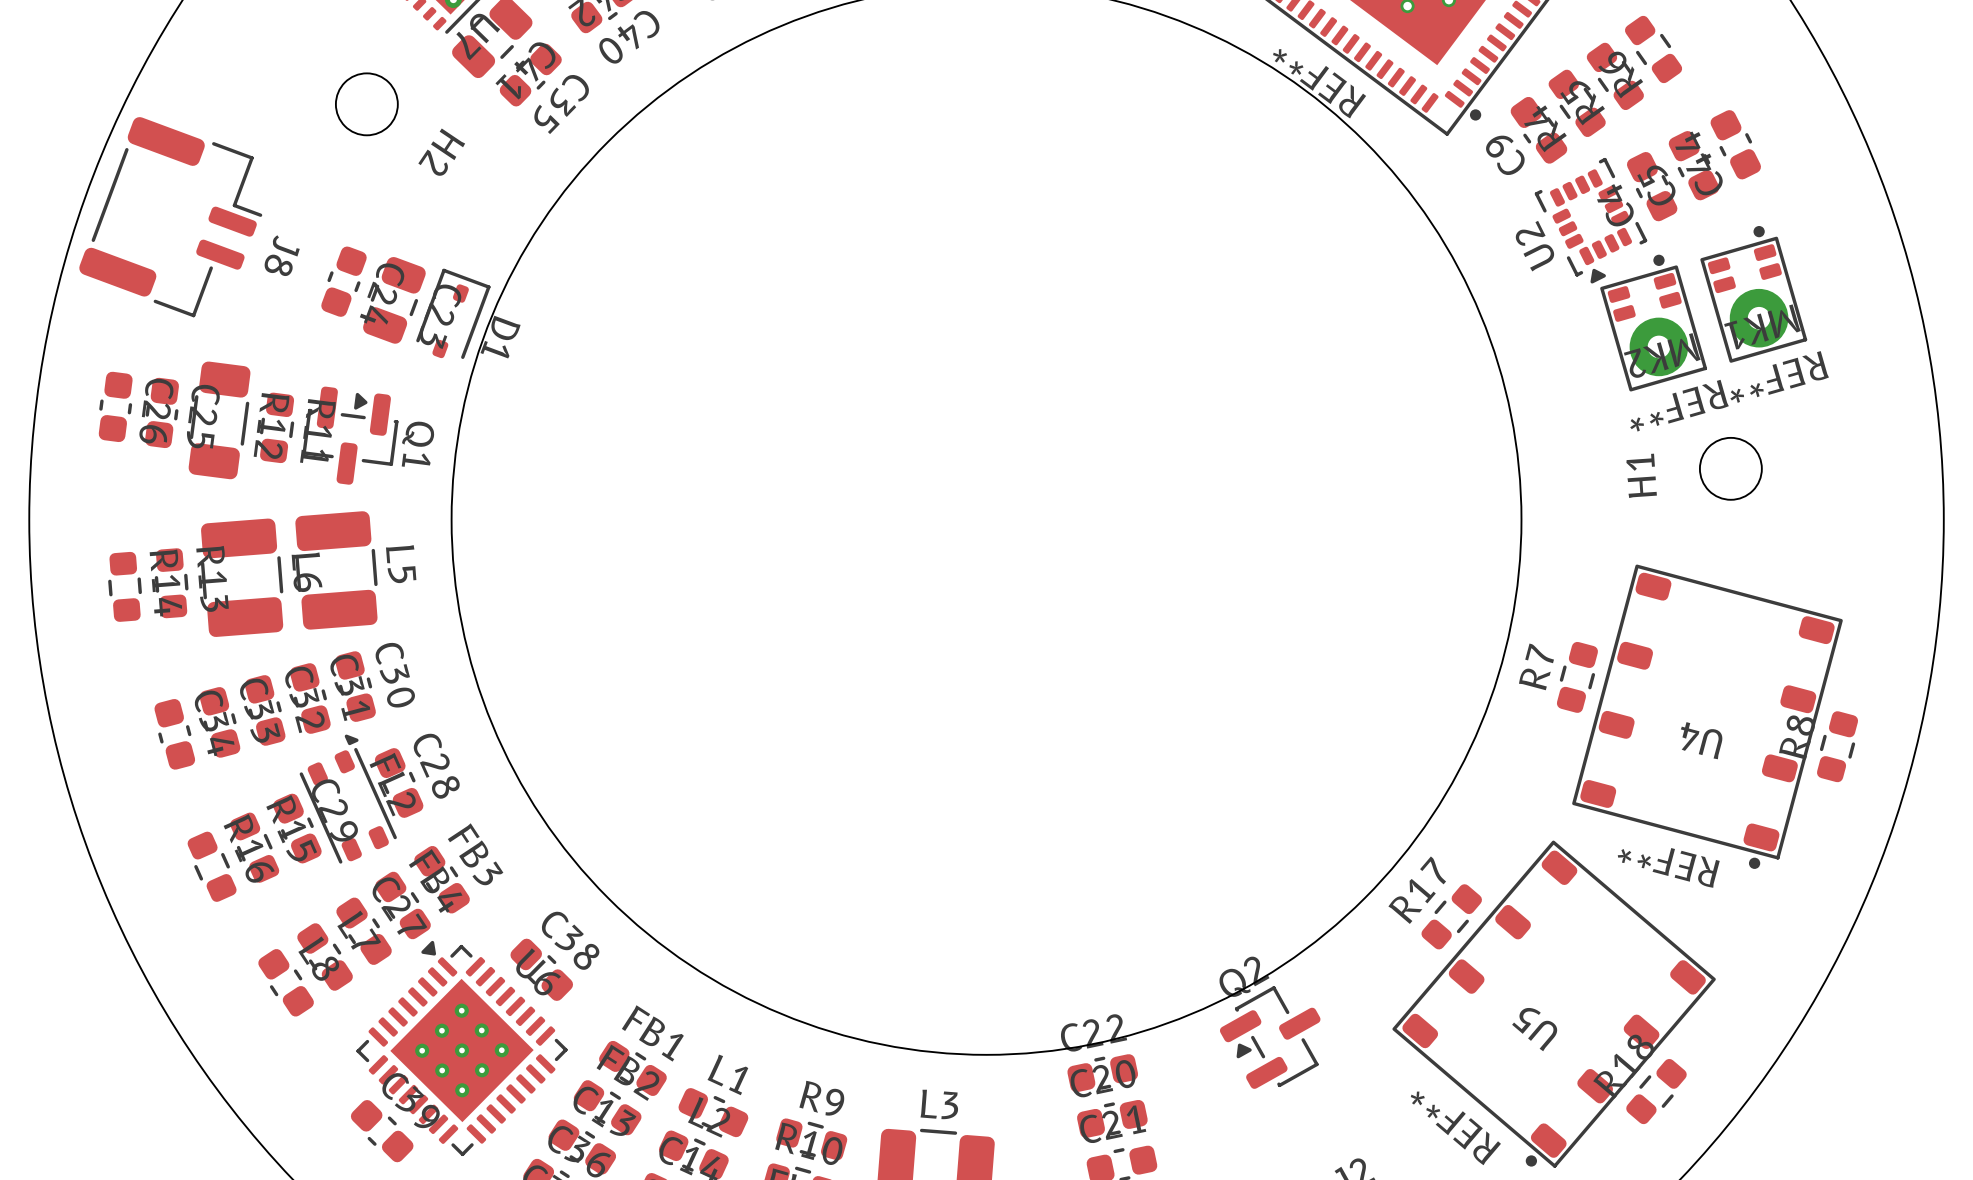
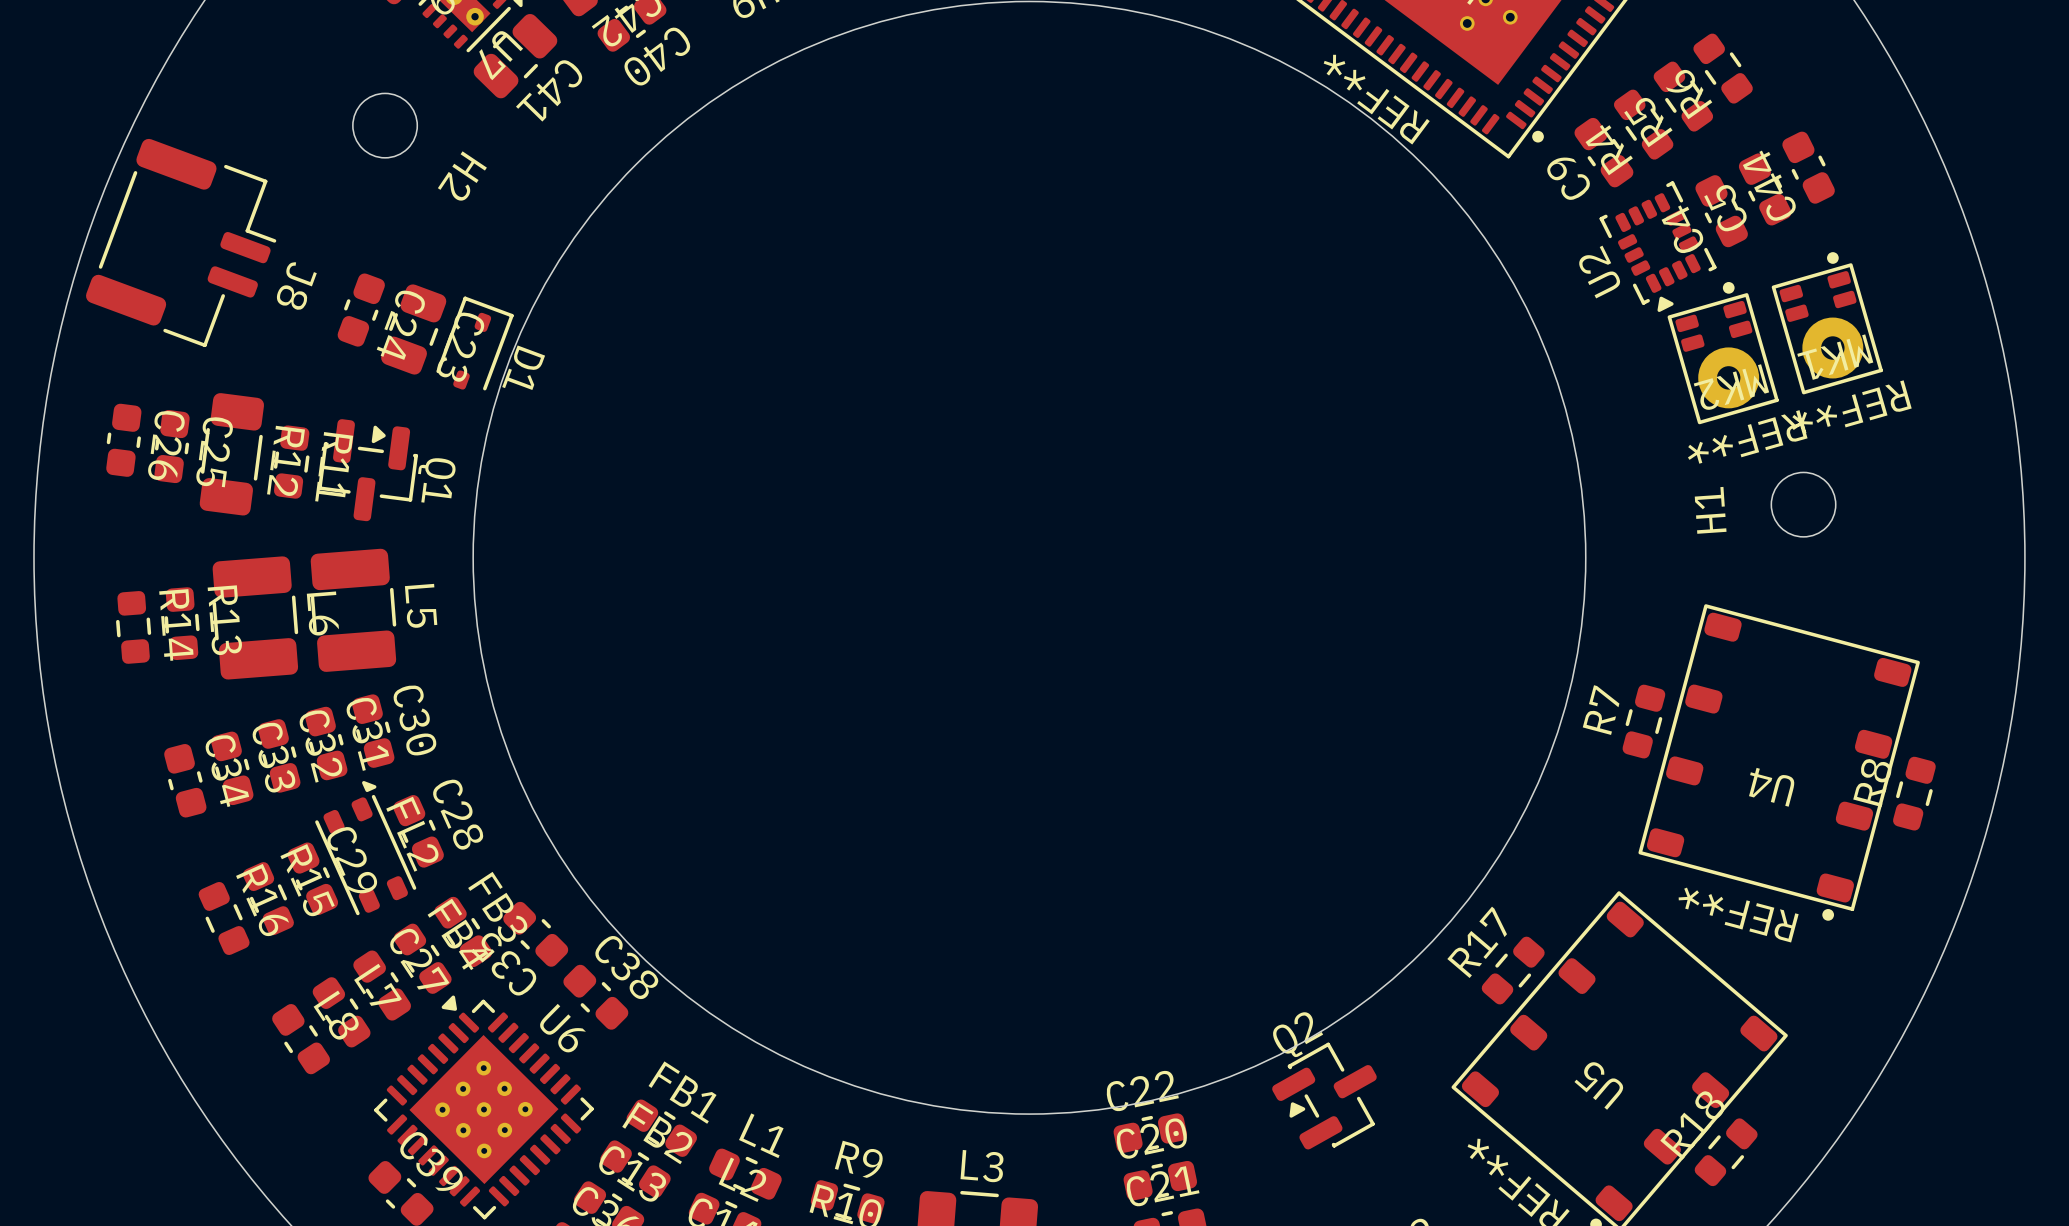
C35 rotation: 0° (530, 75) -> 89.3° counterclockwise (535, 934)
C35 position: (530, 75) -> (535, 934)
C35 name position: C35 (561, 104) -> C35 (504, 964)
C38 name rotation: 0° (570, 940) -> 0.3° clockwise (626, 967)
C38 position: (541, 969) -> (595, 997)

